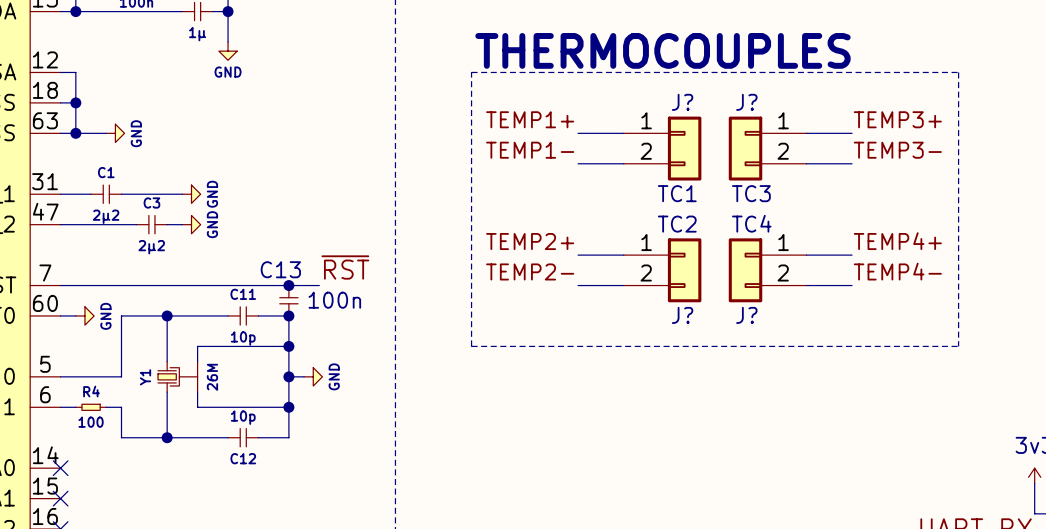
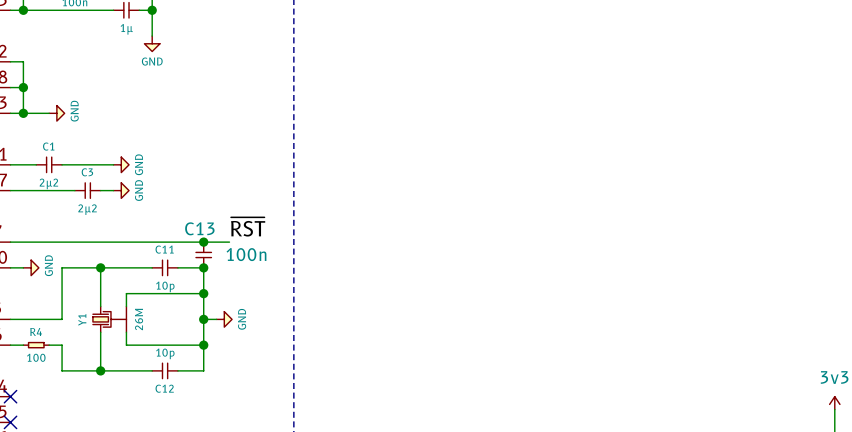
text: THERMOCOUPLES (662, 50) -> none
line: (471, 72) (471, 346) (958, 346) (958, 72) (471, 72) -> none
label: TEMP1+ (530, 119) -> none
label: TEMP3+ (897, 119) -> none
wire: (578, 133) (623, 133) -> none
wire: (806, 133) (852, 133) -> none
J?: TC1 (662, 148) -> none
J?: TC3 (767, 148) -> none
label: TEMP1- (530, 150) -> none
label: TEMP3- (897, 150) -> none
wire: (578, 163) (623, 163) -> none
wire: (806, 163) (852, 163) -> none
label: TEMP2+ (530, 241) -> none
label: TEMP4+ (897, 241) -> none
wire: (578, 255) (623, 255) -> none
wire: (806, 255) (852, 255) -> none
J?: TC2 (662, 270) -> none
J?: TC4 (767, 270) -> none
label: TEMP2- (530, 271) -> none
label: TEMP4- (897, 271) -> none
wire: (578, 285) (623, 285) -> none
wire: (806, 285) (852, 285) -> none

